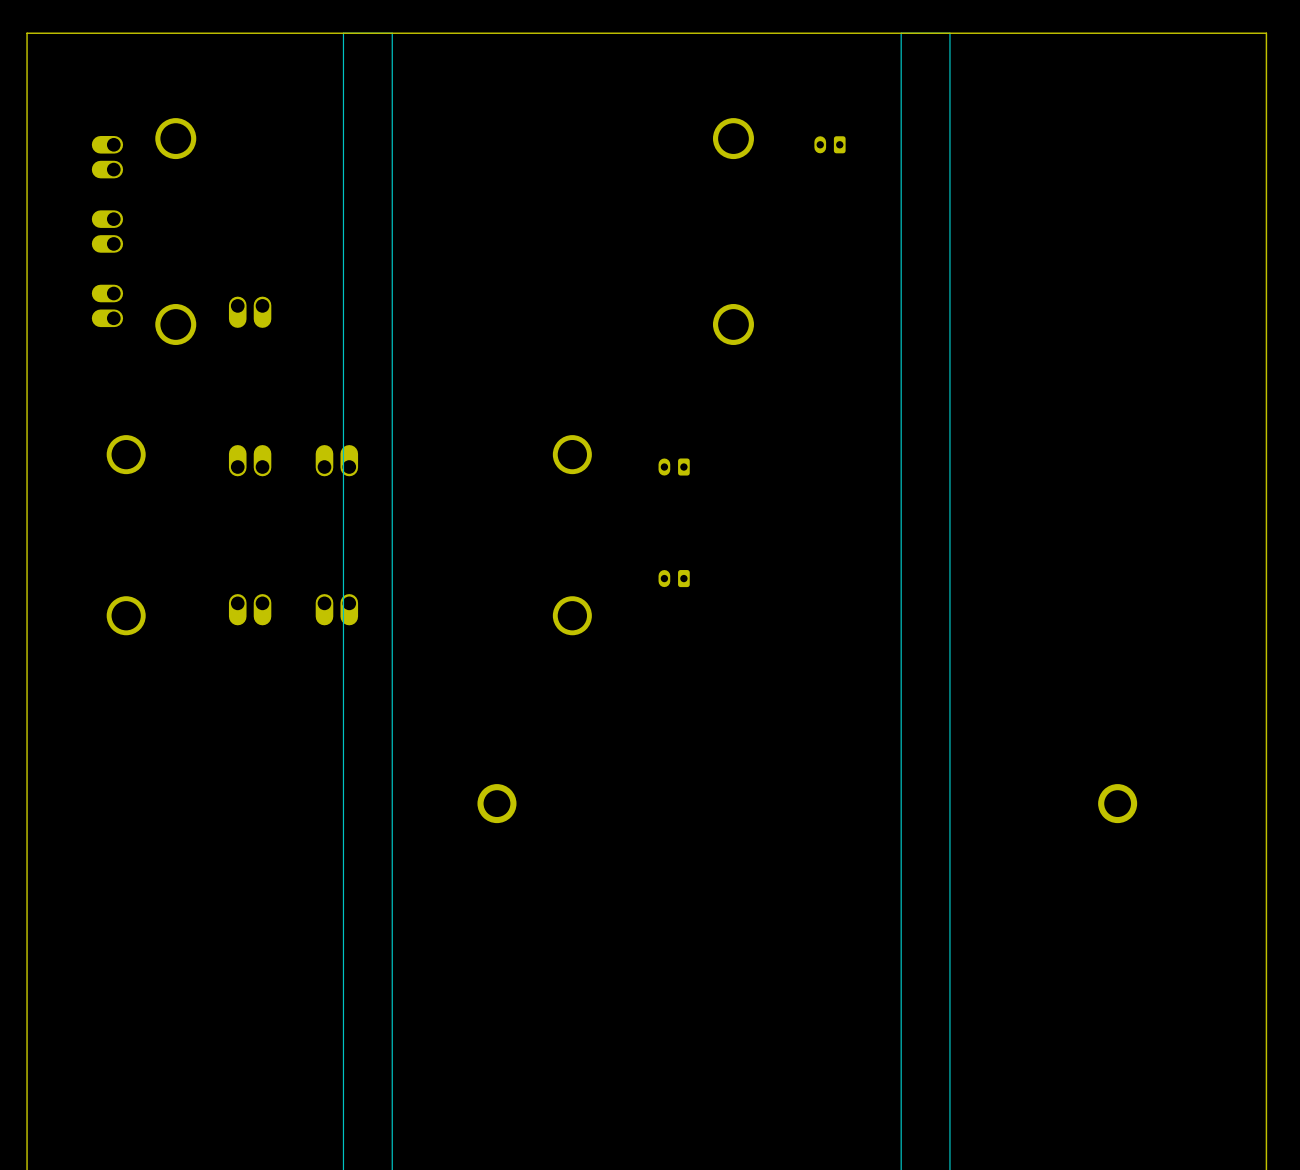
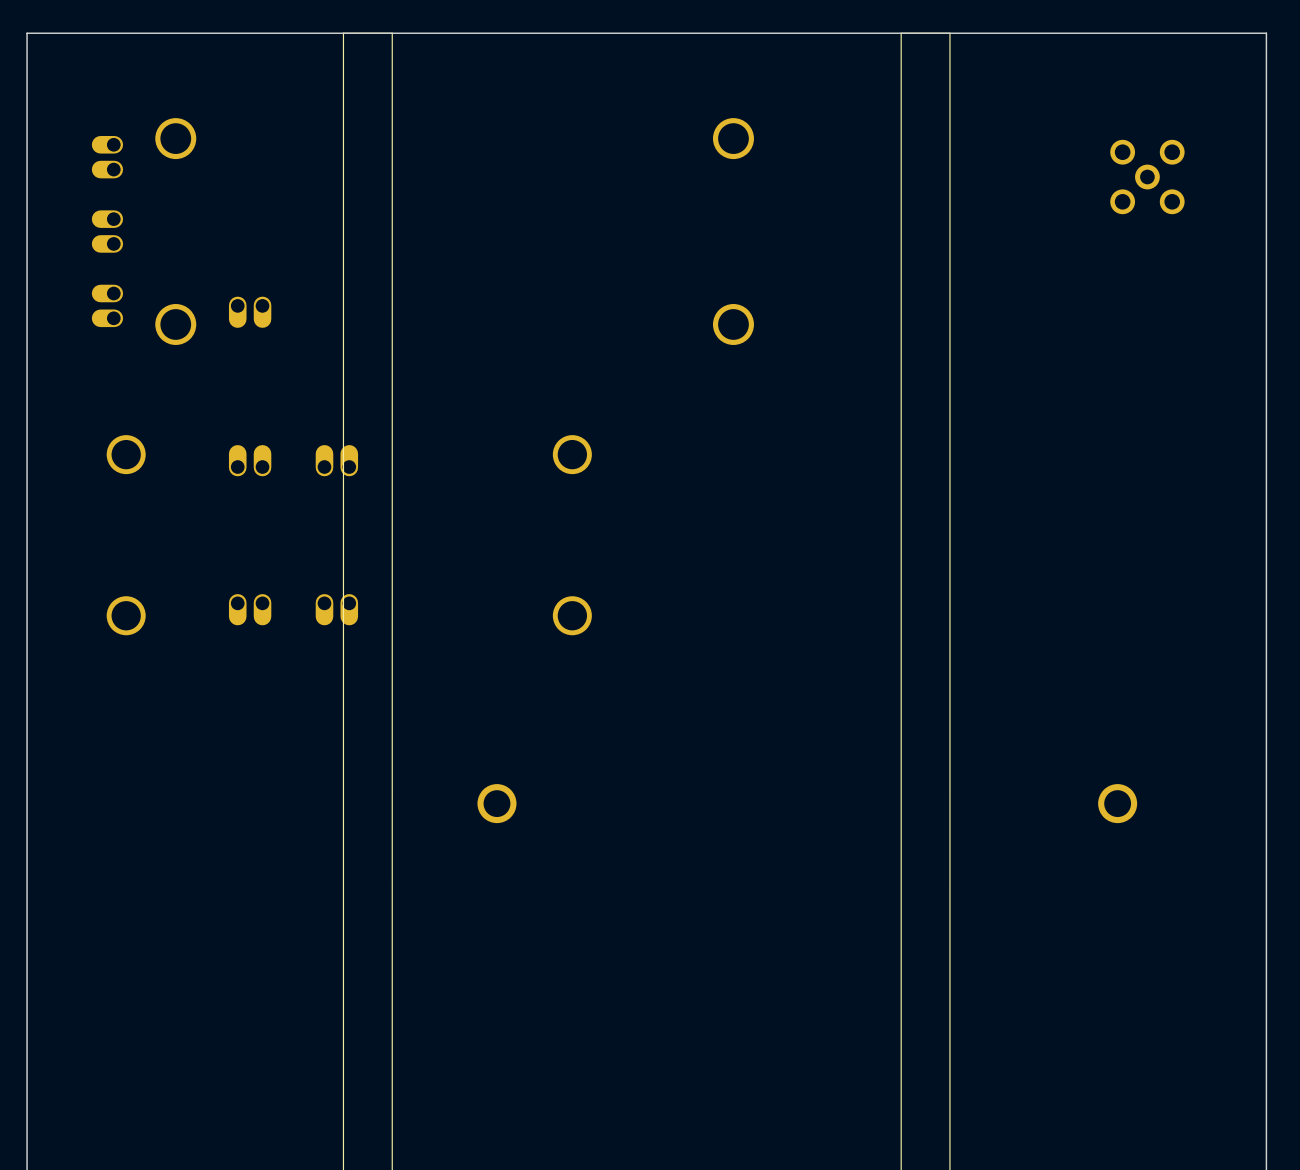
part: (829, 144) -> none
part: none -> (1147, 177)
part: (674, 467) -> none
part: (674, 578) -> none

